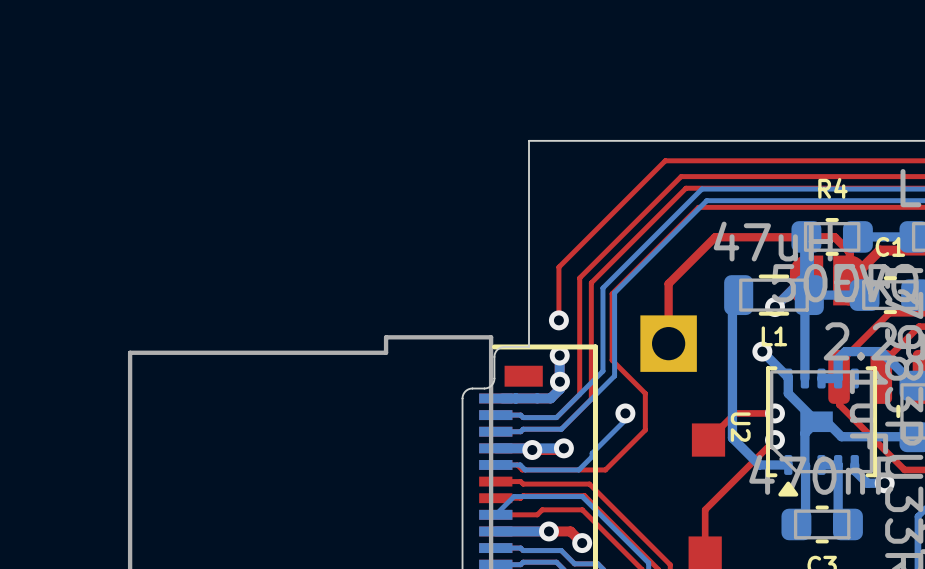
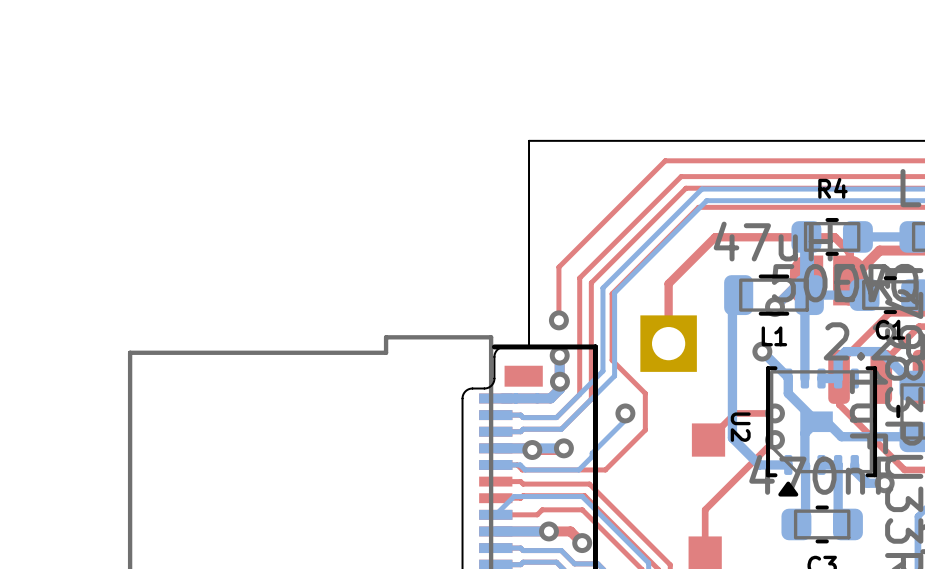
C1 name position: C1 (890, 246) -> C1 (890, 329)

